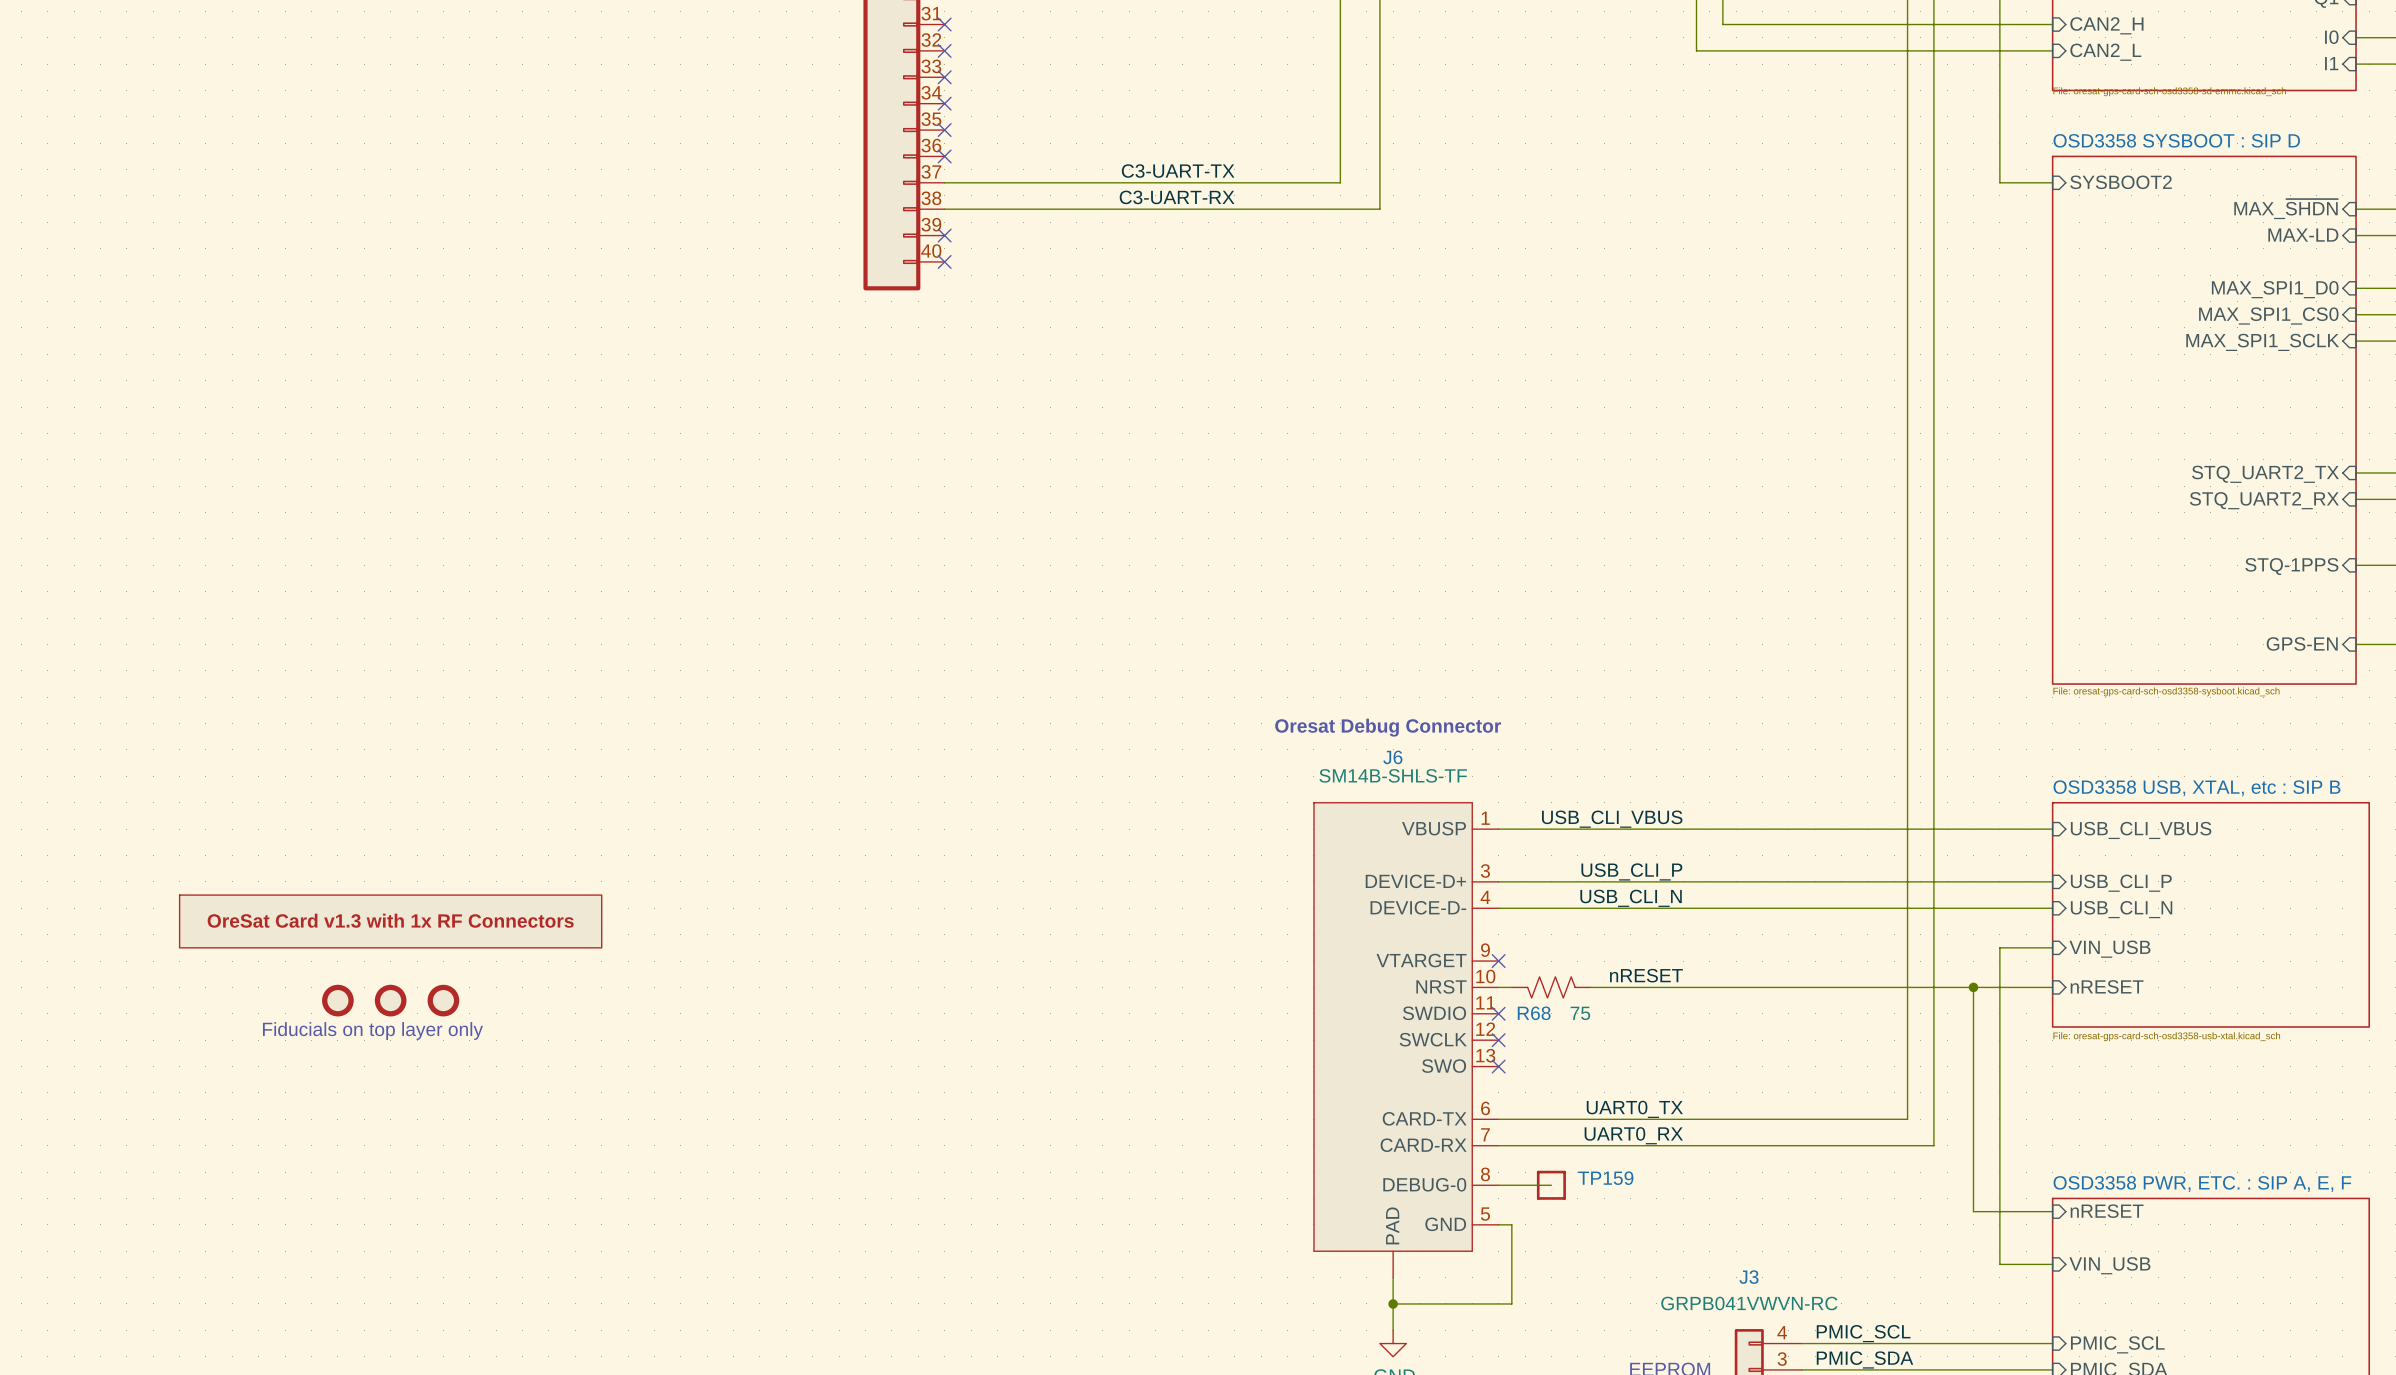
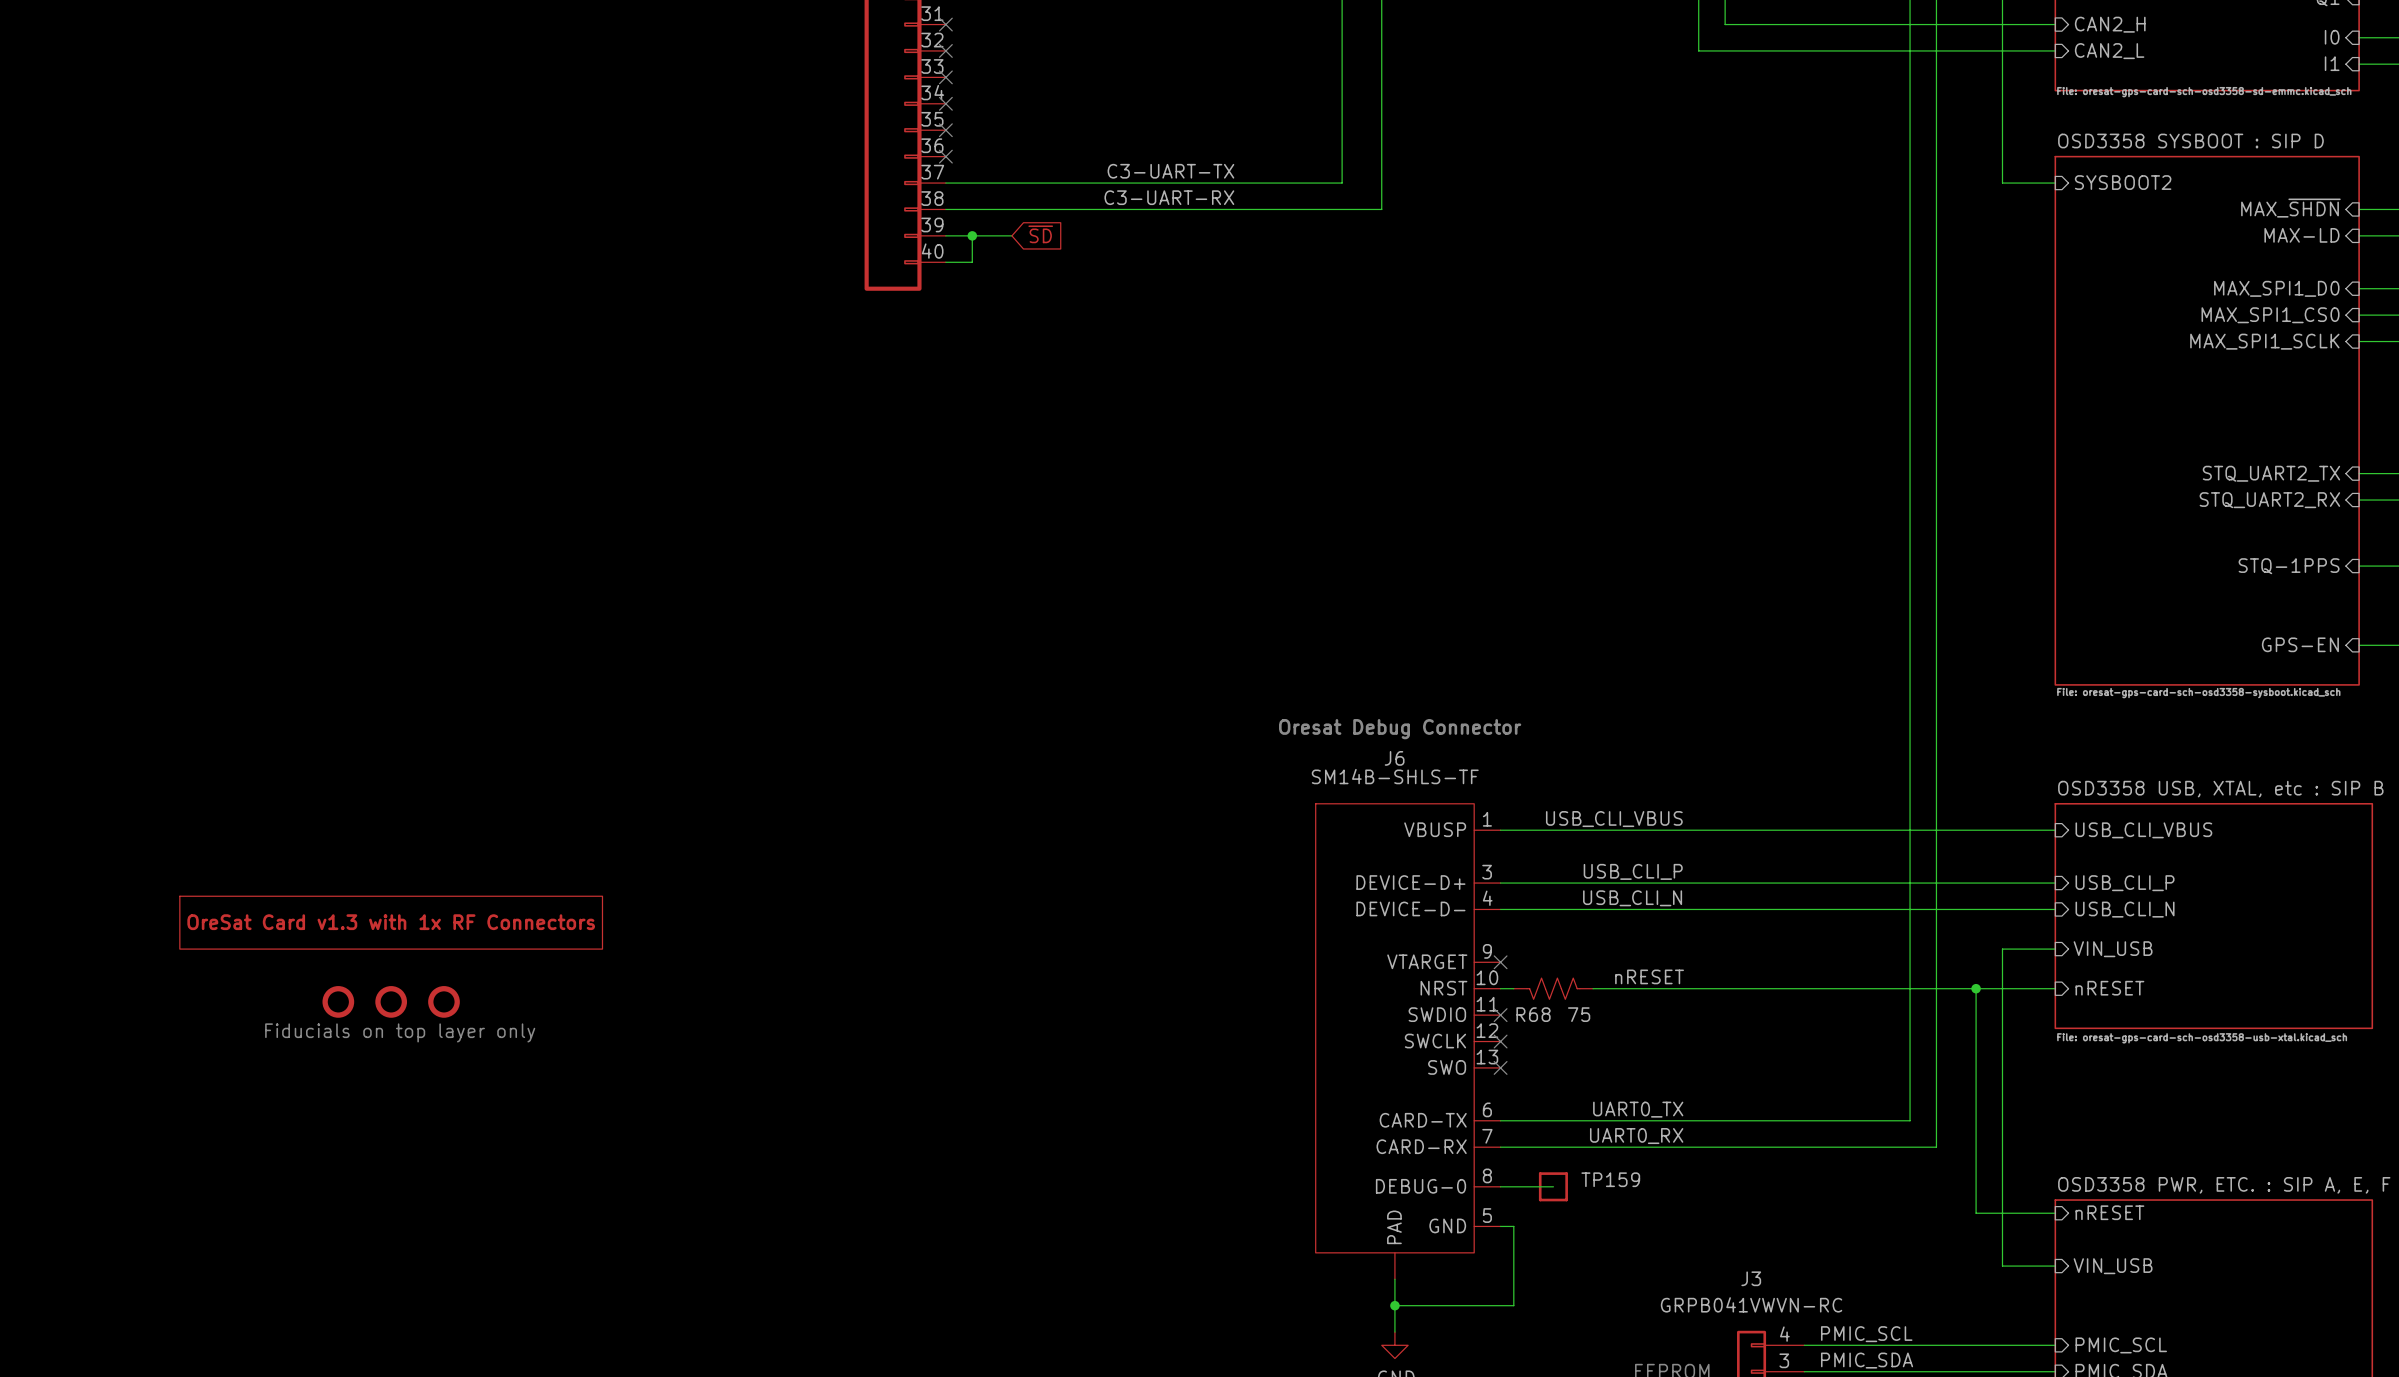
global label: none -> ~{SD} (1040, 234)
wire: none -> (945, 235) (1011, 235)
no-connect mark: (944, 235) -> none
wire: none -> (972, 235) (972, 262) (945, 262)
junction: none -> (972, 235)
no-connect mark: (944, 261) -> none

